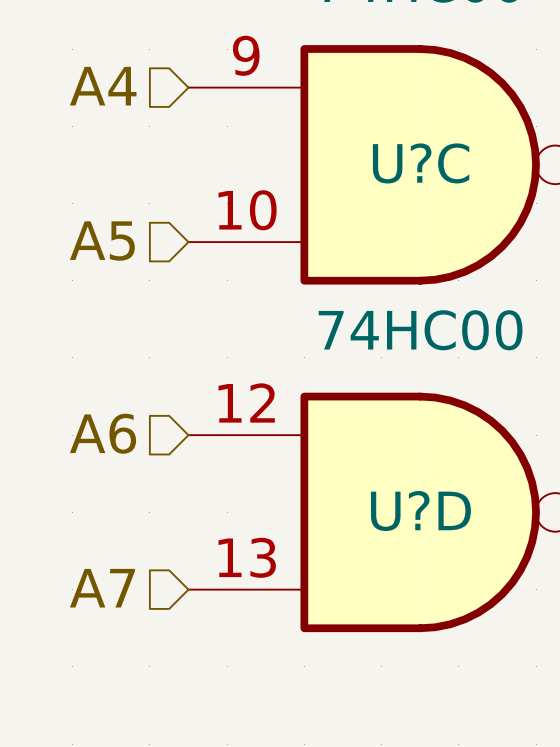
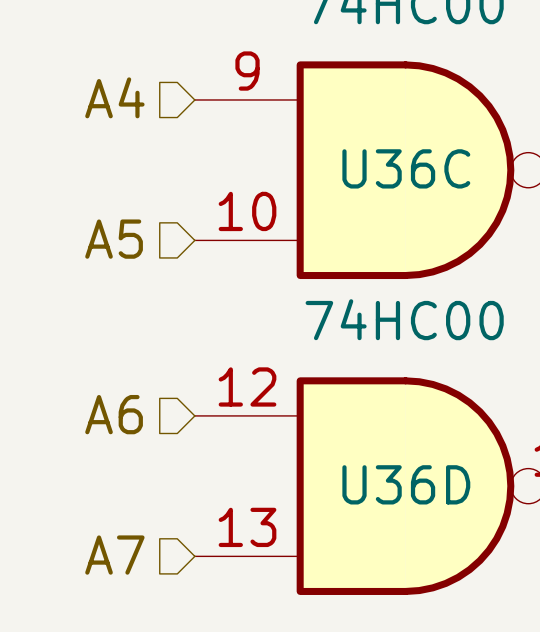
U?C name: U?C (421, 163) -> U36C (406, 168)
U?D name: U?D (420, 510) -> U36D (406, 484)

